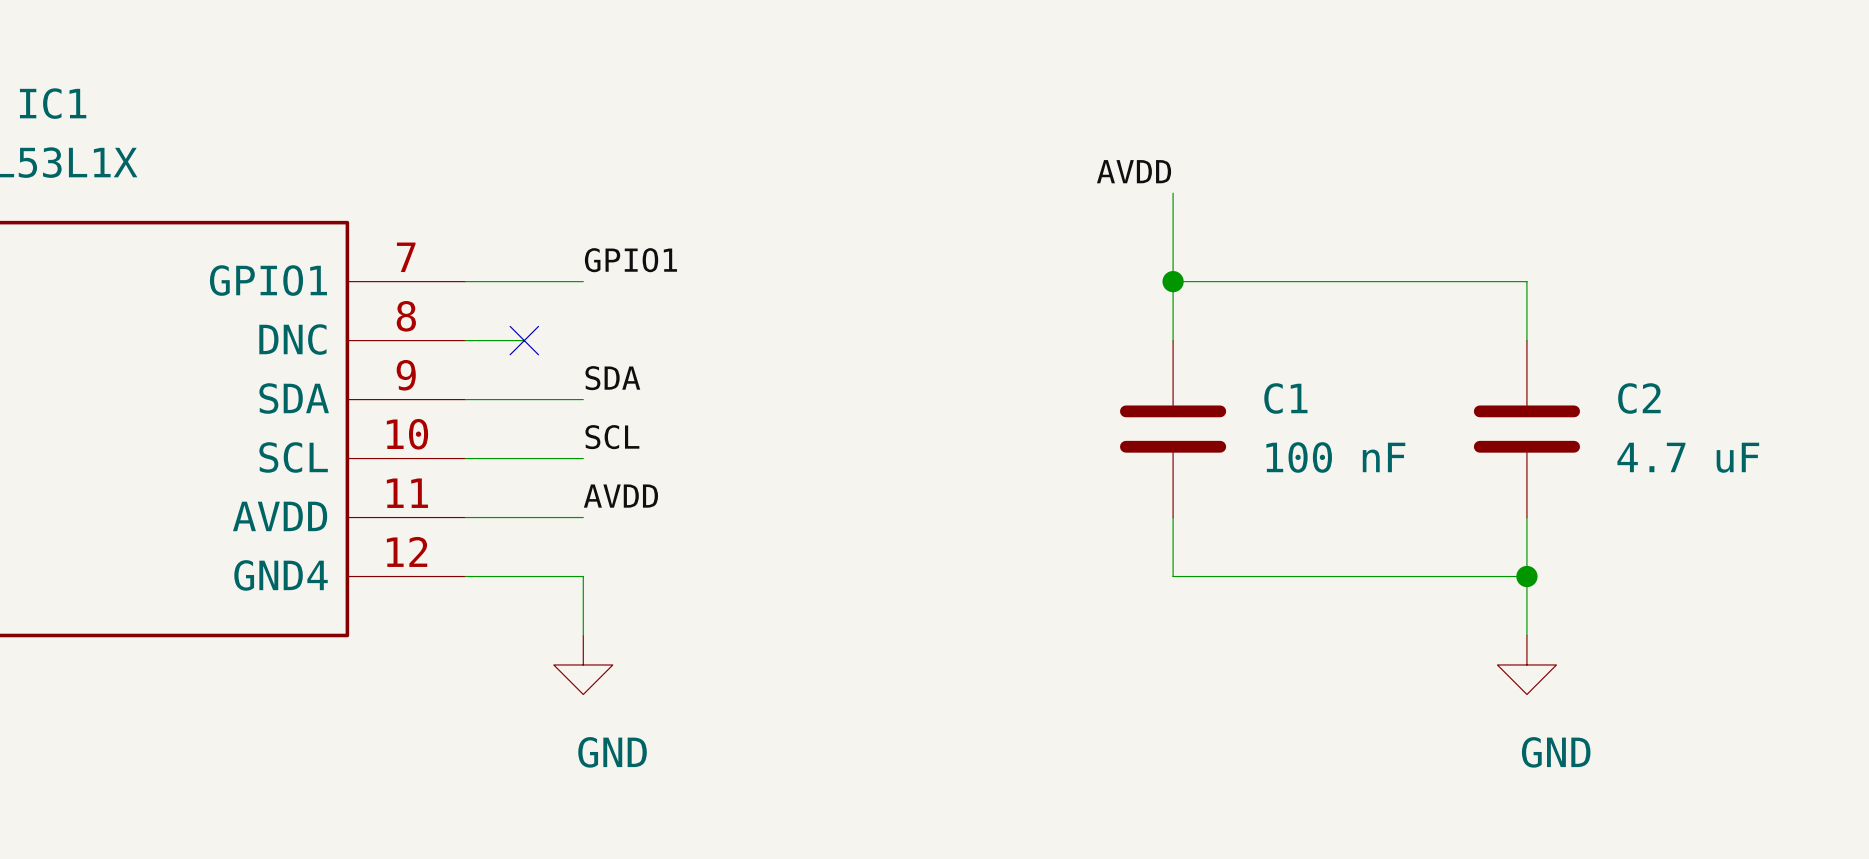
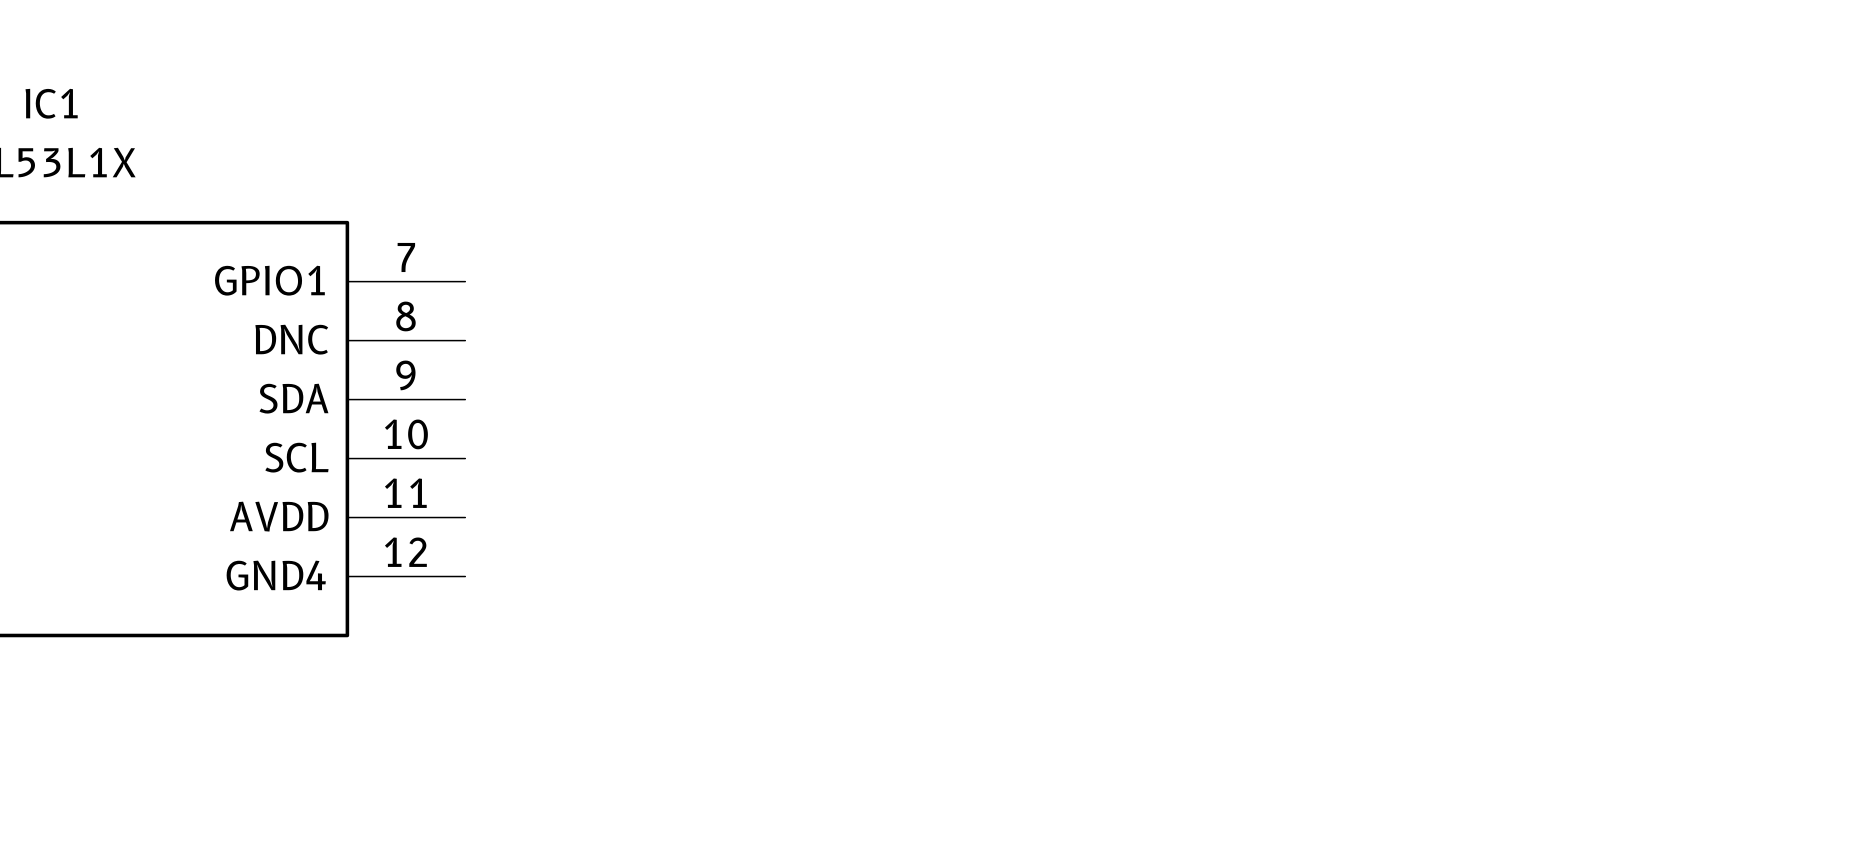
label: AVDD (1134, 171) -> none
wire: (1173, 193) (1173, 340) -> none
label: GPIO1 (630, 260) -> none
wire: (465, 281) (583, 281) -> none
wire: (1173, 281) (1526, 281) (1526, 340) -> none
junction: (1173, 281) -> none
wire: (465, 340) (524, 340) -> none
no-connect mark: (524, 340) -> none
label: SDA (612, 378) -> none
wire: (465, 399) (583, 399) -> none
C1: 100 nF (1173, 429) -> none
C2: 4.7 uF (1526, 429) -> none
label: SCL (612, 437) -> none
wire: (465, 458) (583, 458) -> none
label: AVDD (620, 496) -> none
wire: (465, 517) (583, 517) -> none
wire: (1173, 517) (1173, 576) (1526, 576) -> none
wire: (1526, 517) (1526, 635) -> none
wire: (465, 576) (583, 576) (583, 635) -> none
junction: (1526, 576) -> none
power symbol: GND (583, 664) -> none
power symbol: GND (1526, 664) -> none

